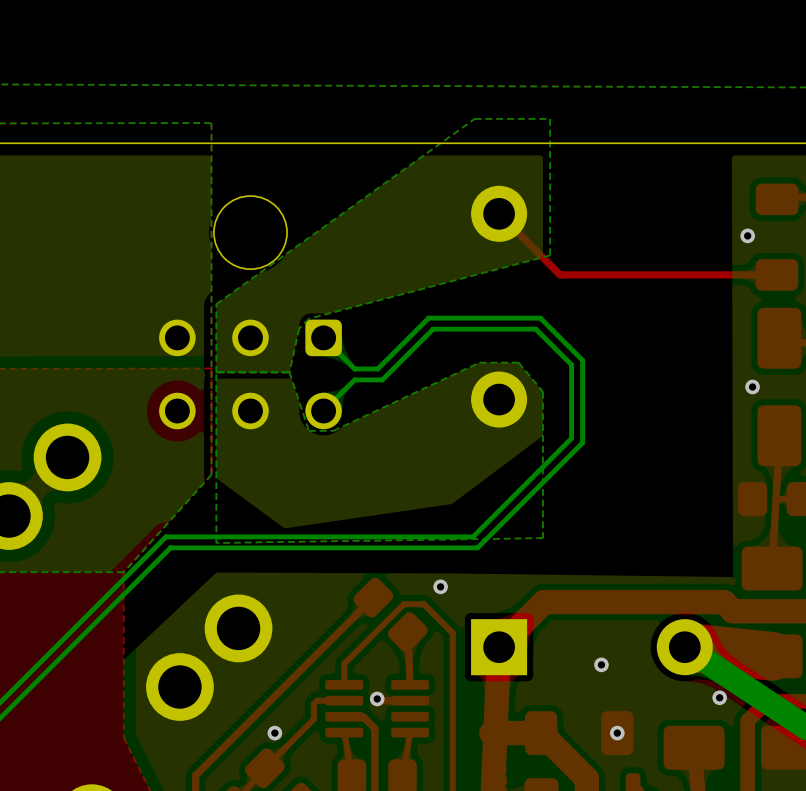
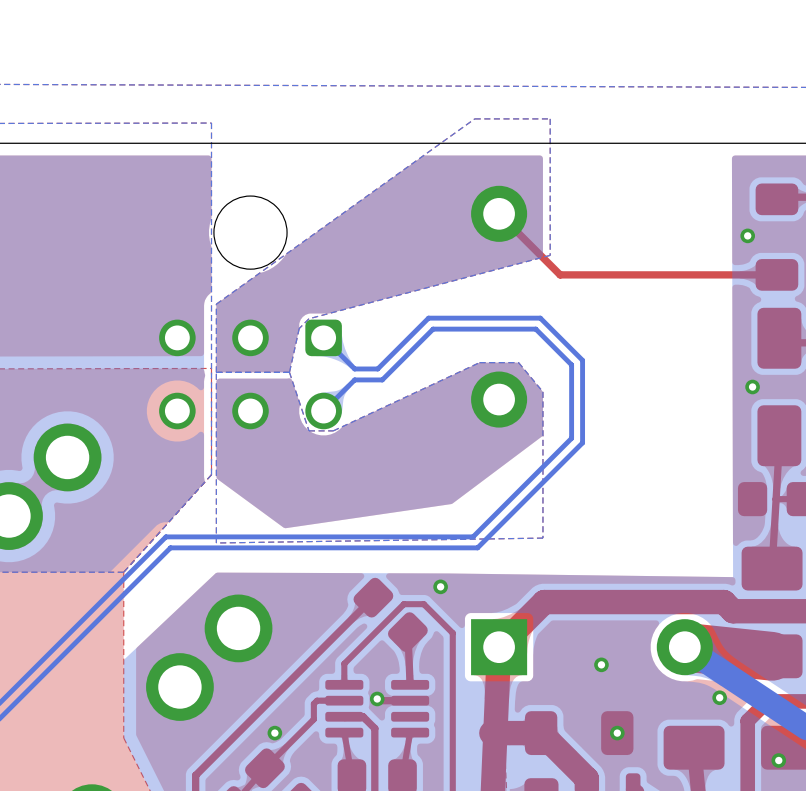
via: none -> (778, 760)

